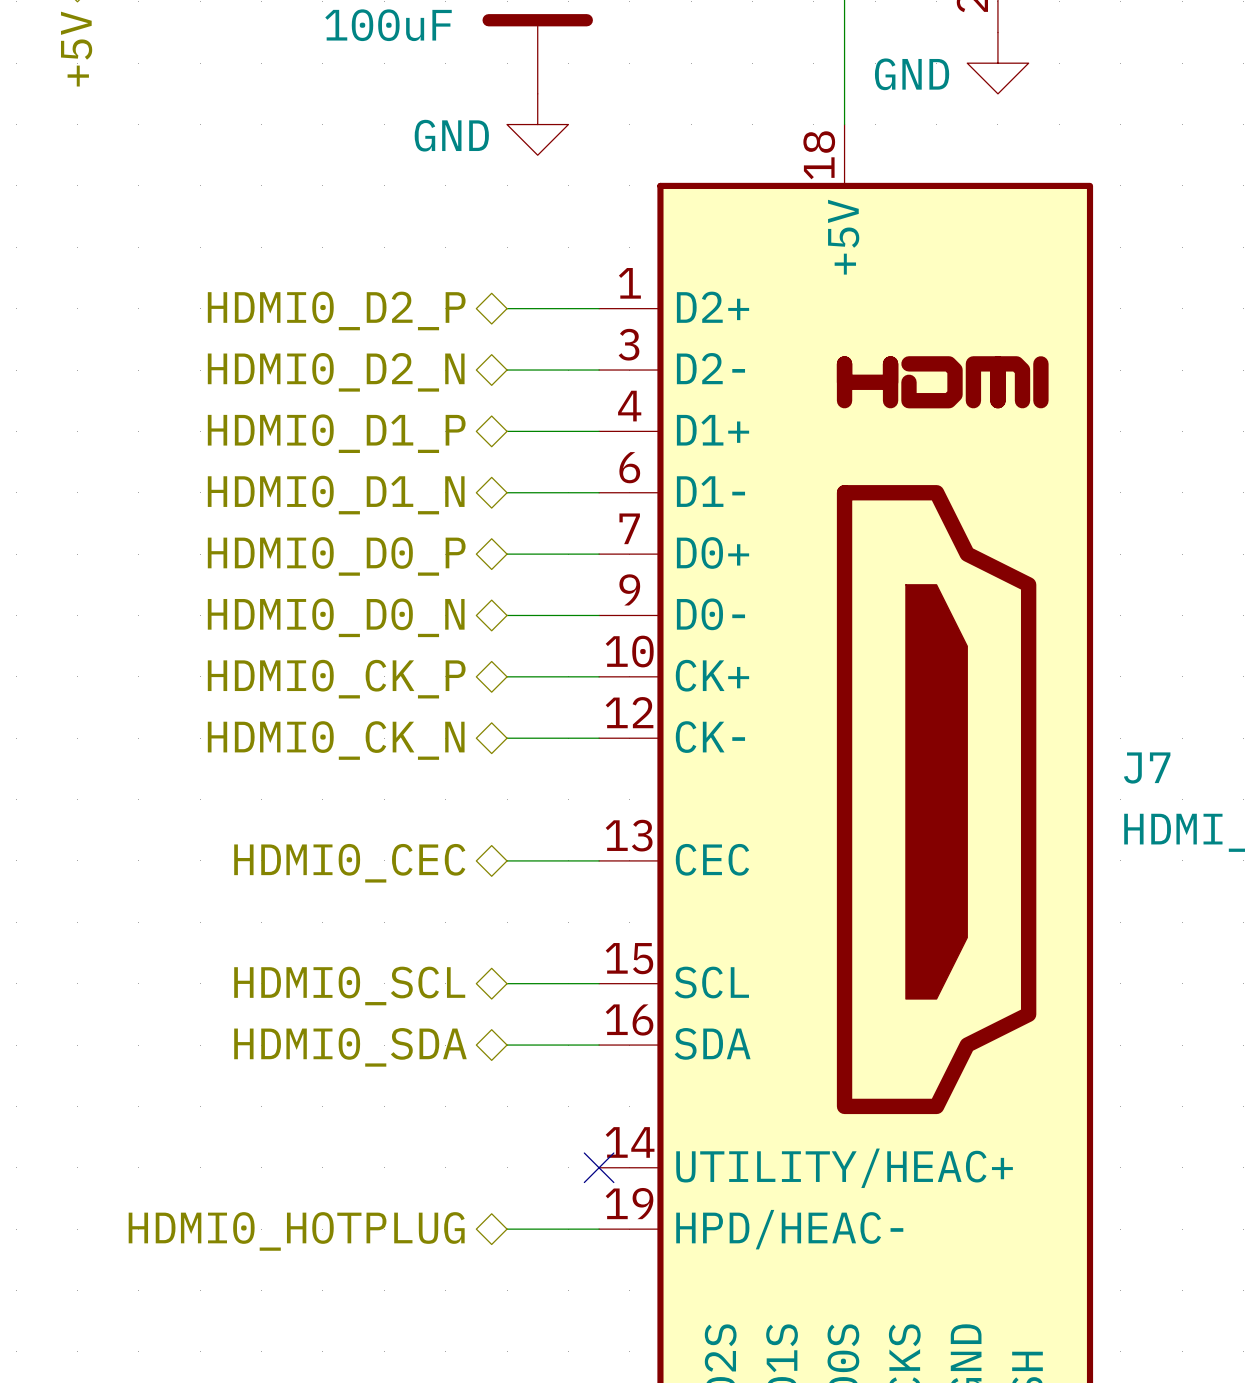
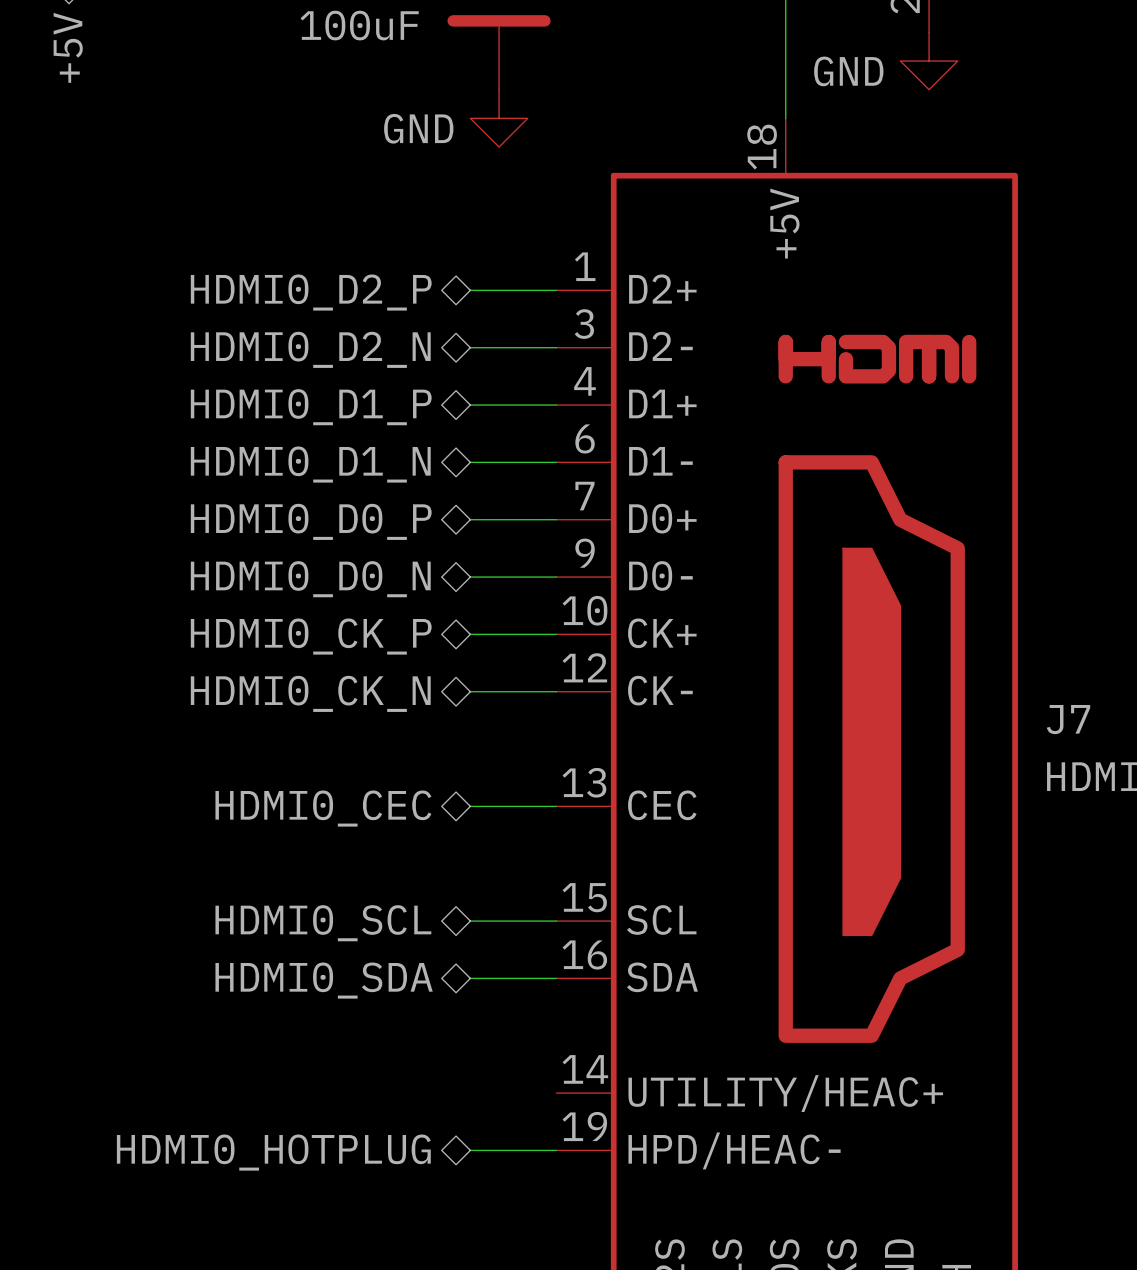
no-connect mark: (599, 1167) -> none

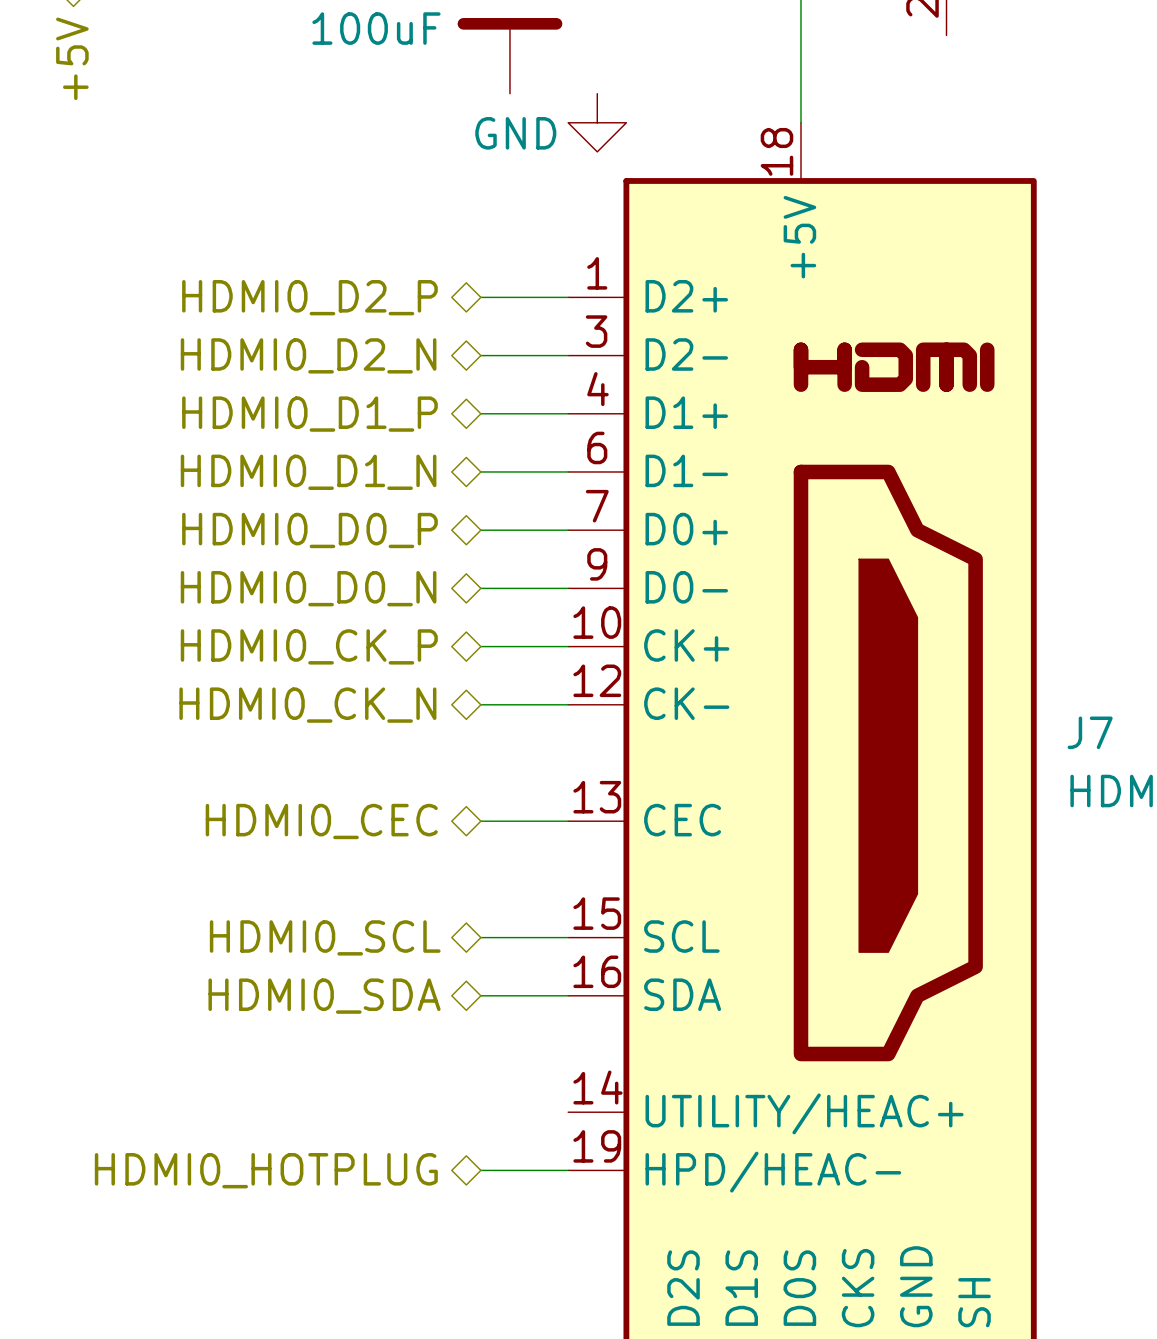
power symbol: GND (929, 61) -> none
power symbol position: GND (499, 118) -> GND (597, 122)

